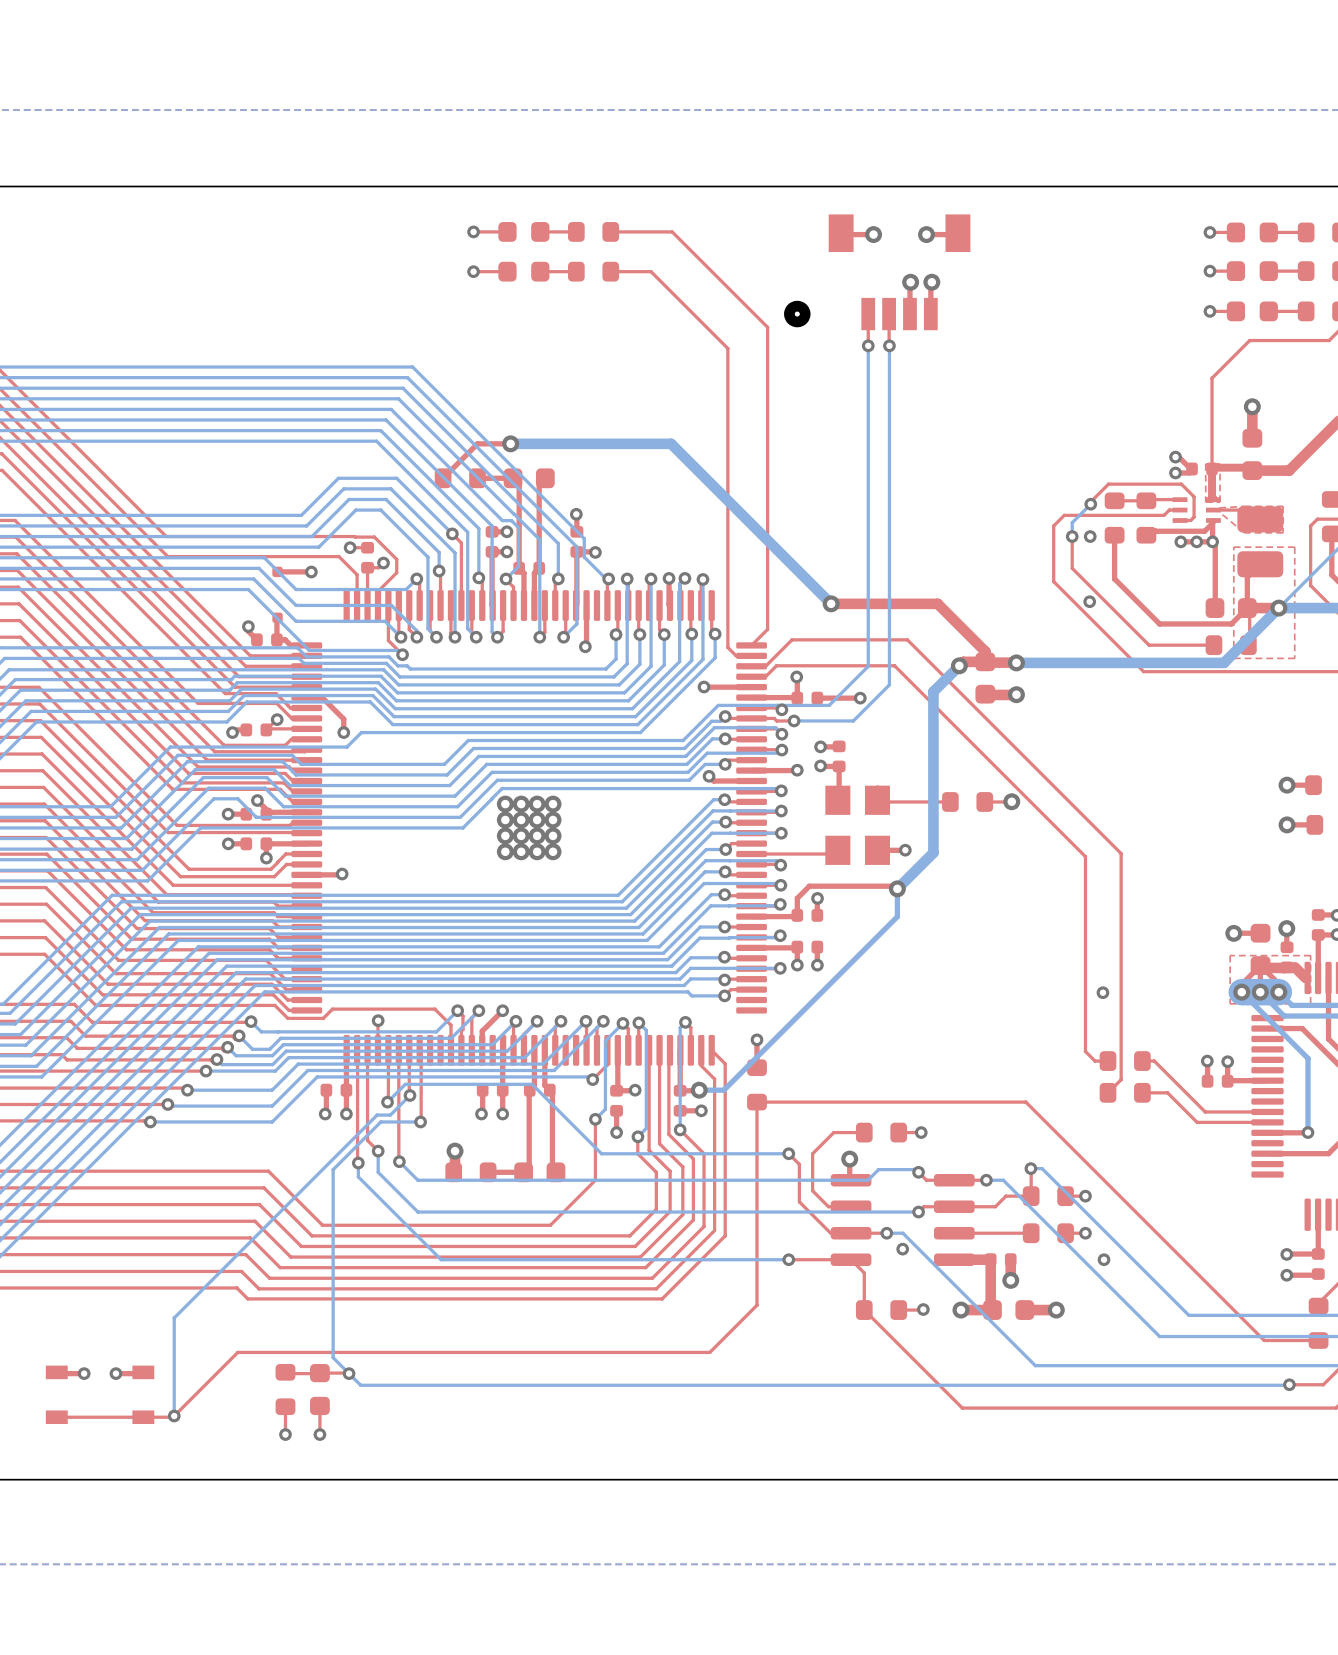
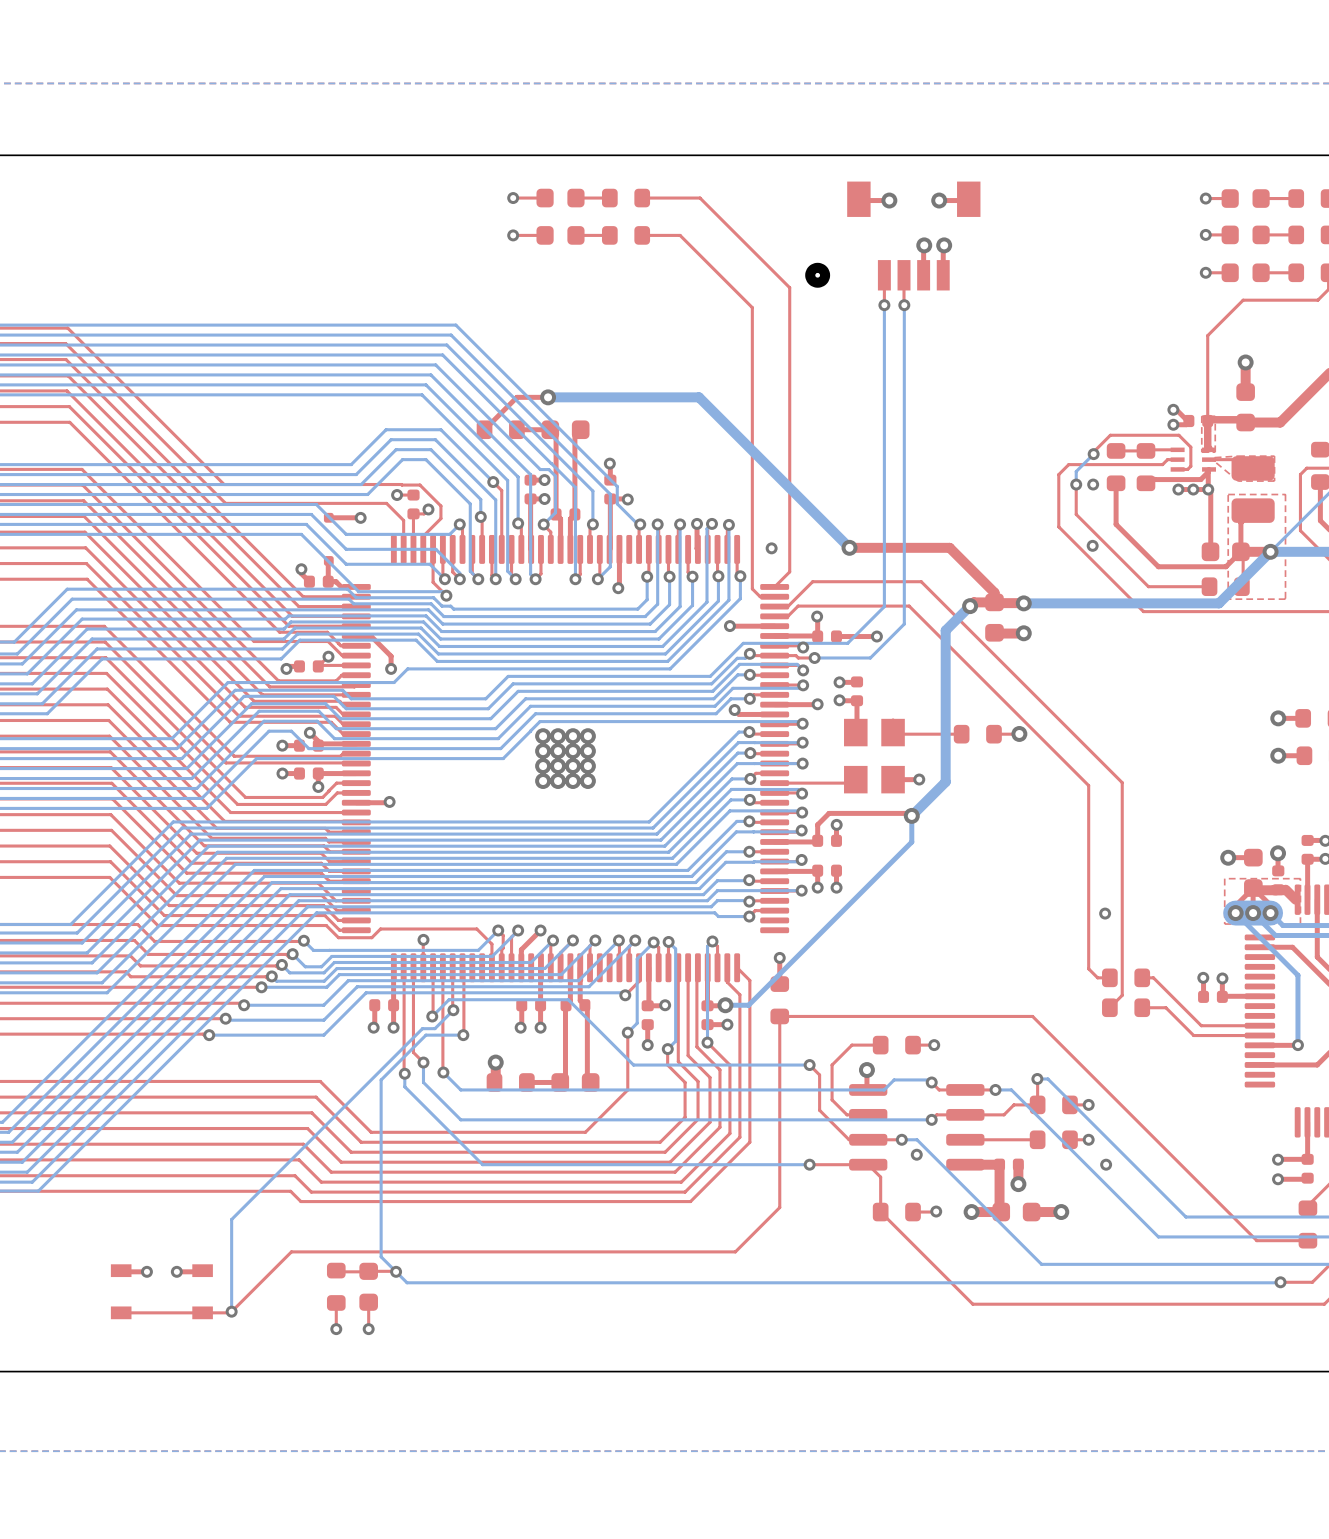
via: none -> (771, 548)

